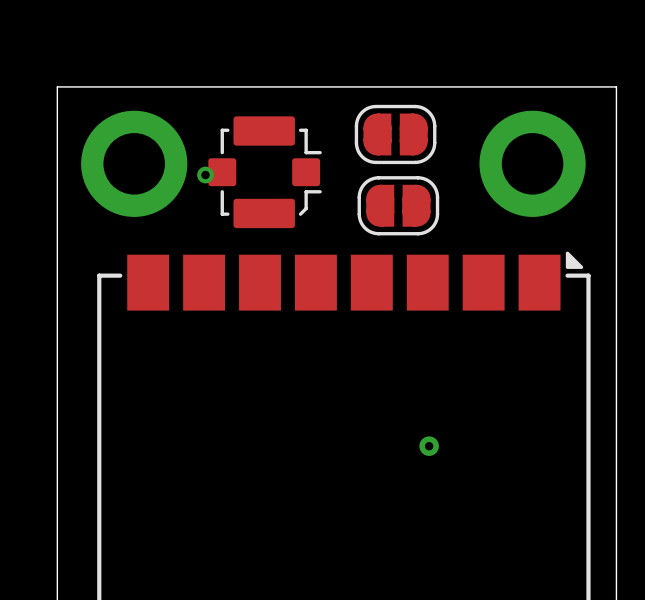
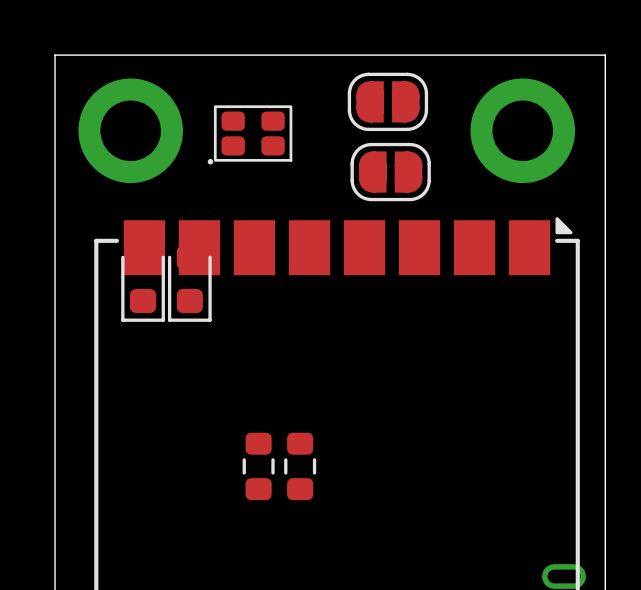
part footprint: [208, 116, 322, 229] -> [207, 105, 293, 165]
via: (205, 175) -> none
part: none -> (143, 283)
part: none -> (189, 283)
via: (429, 446) -> none
part: none -> (258, 466)
part: none -> (300, 466)

